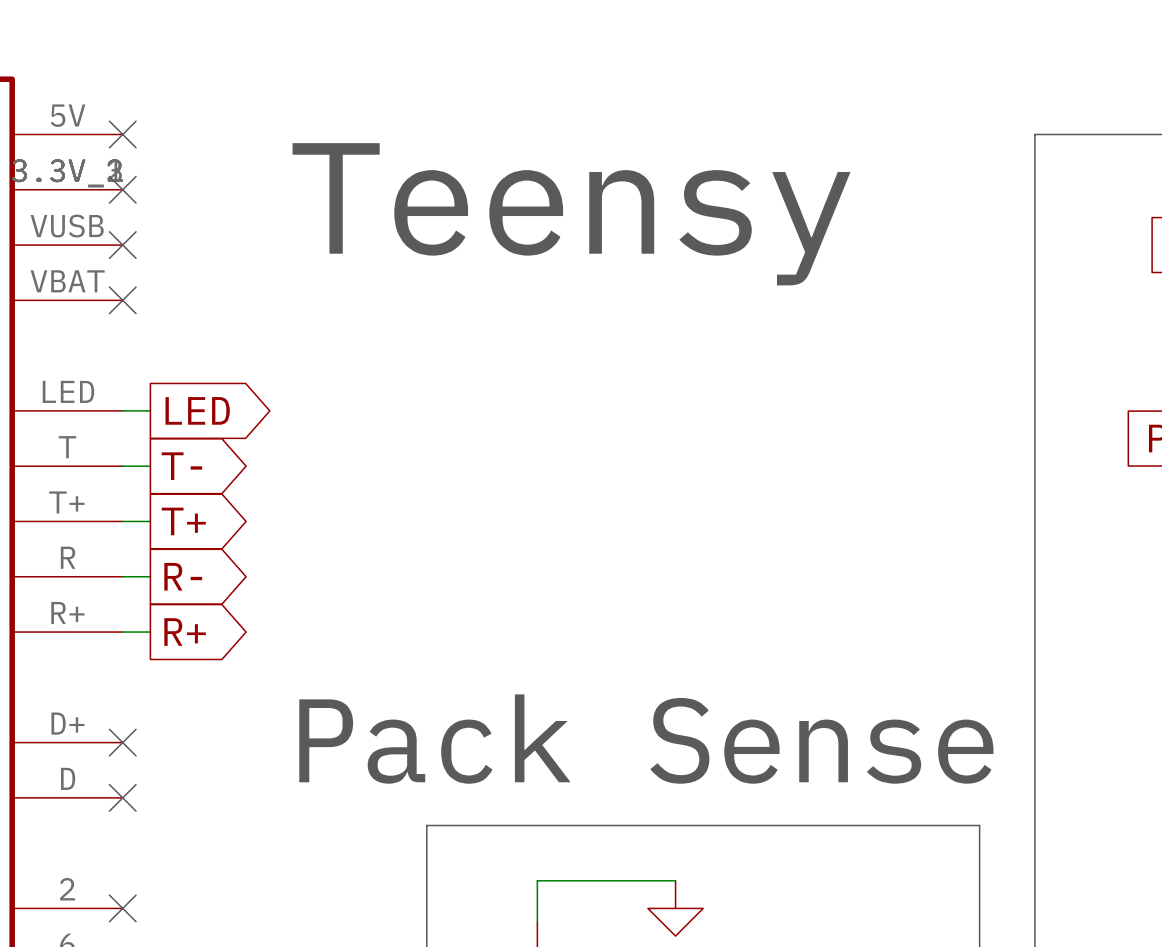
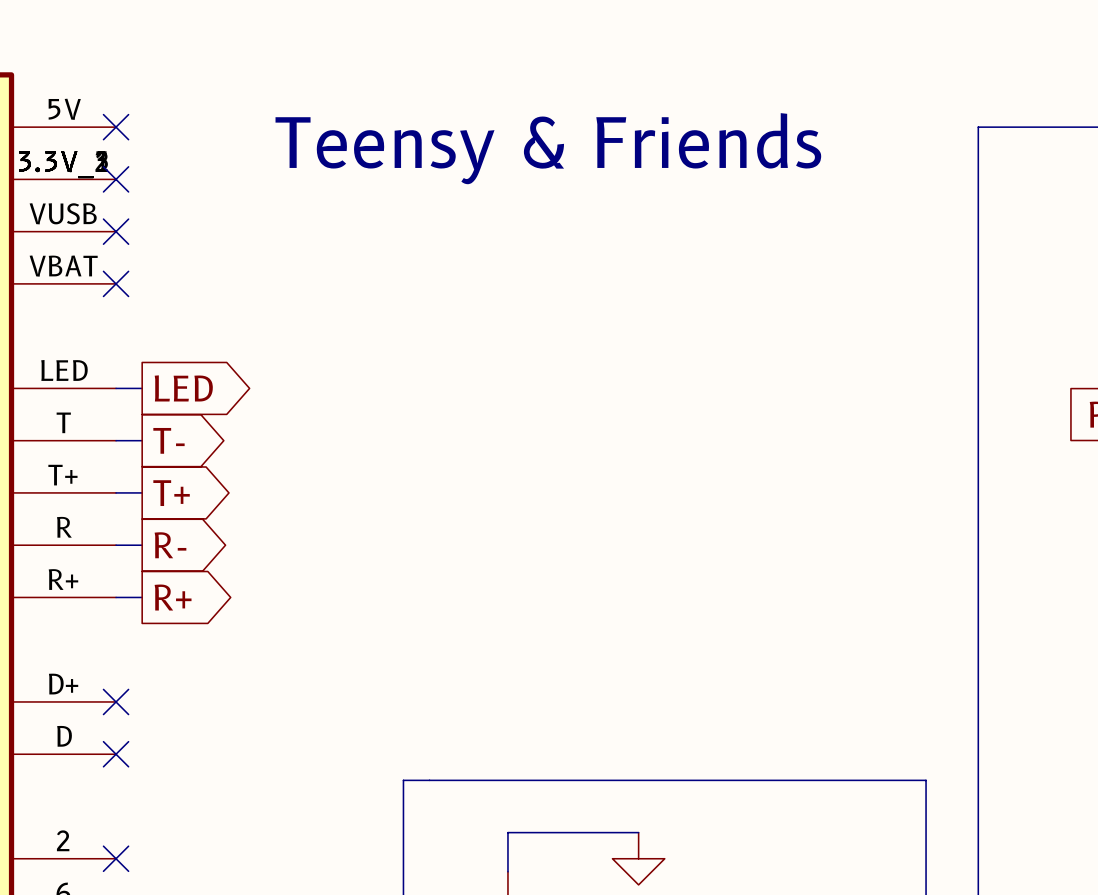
text: none -> Teensy & Friends (548, 148)
text: Teensy (571, 214) -> none
text: Pack Sense (646, 739) -> none

